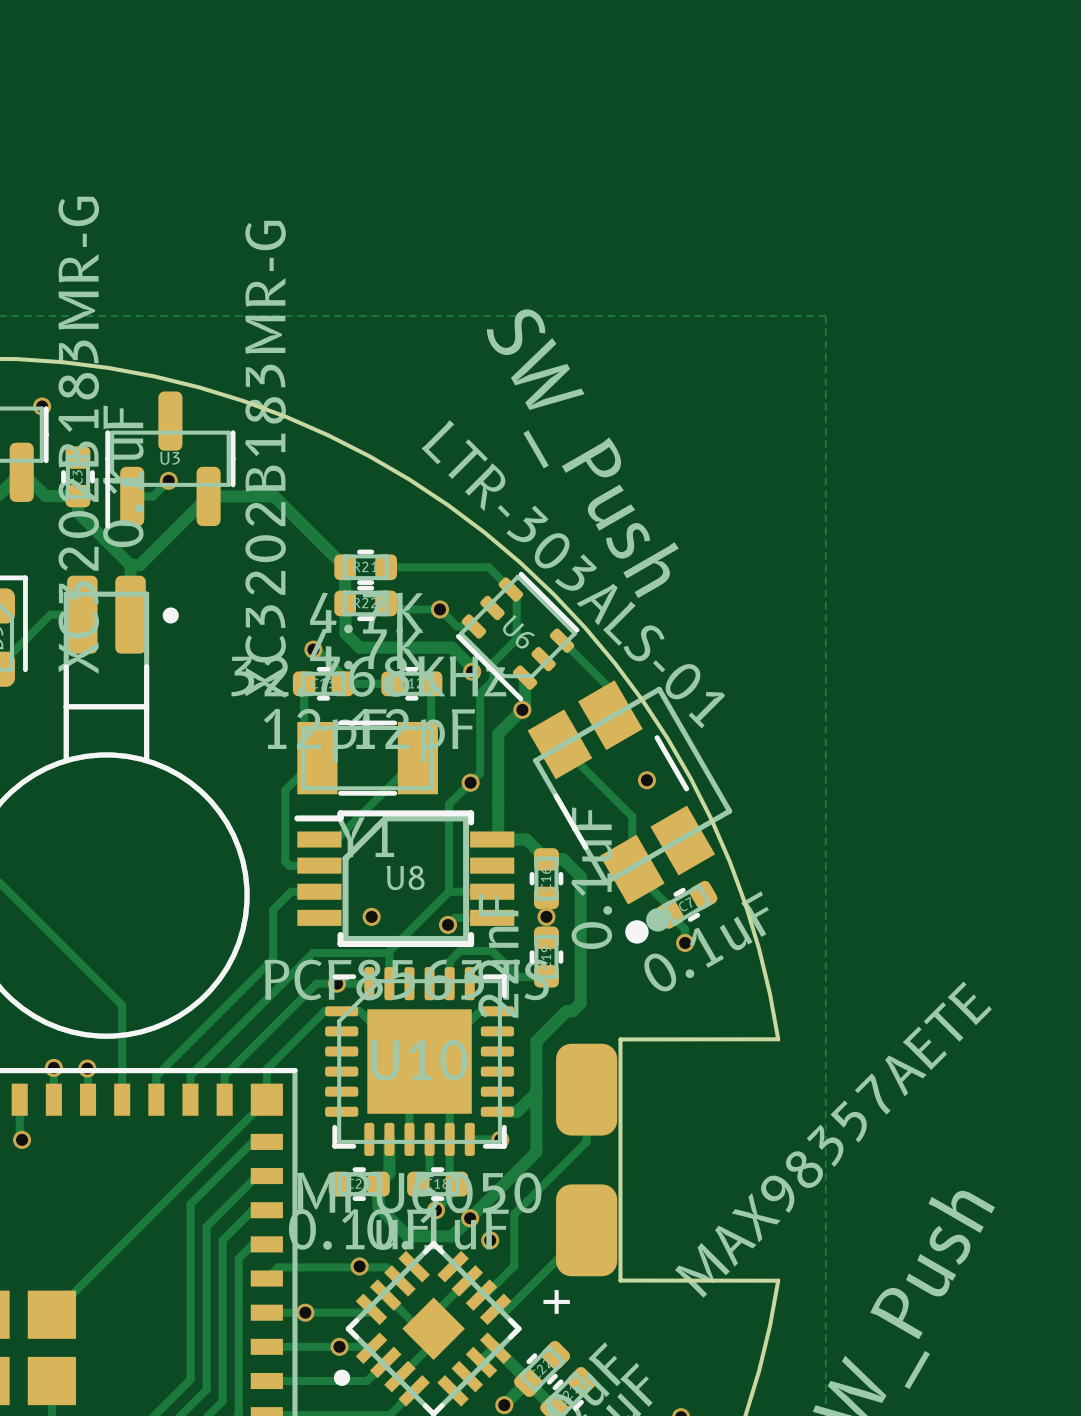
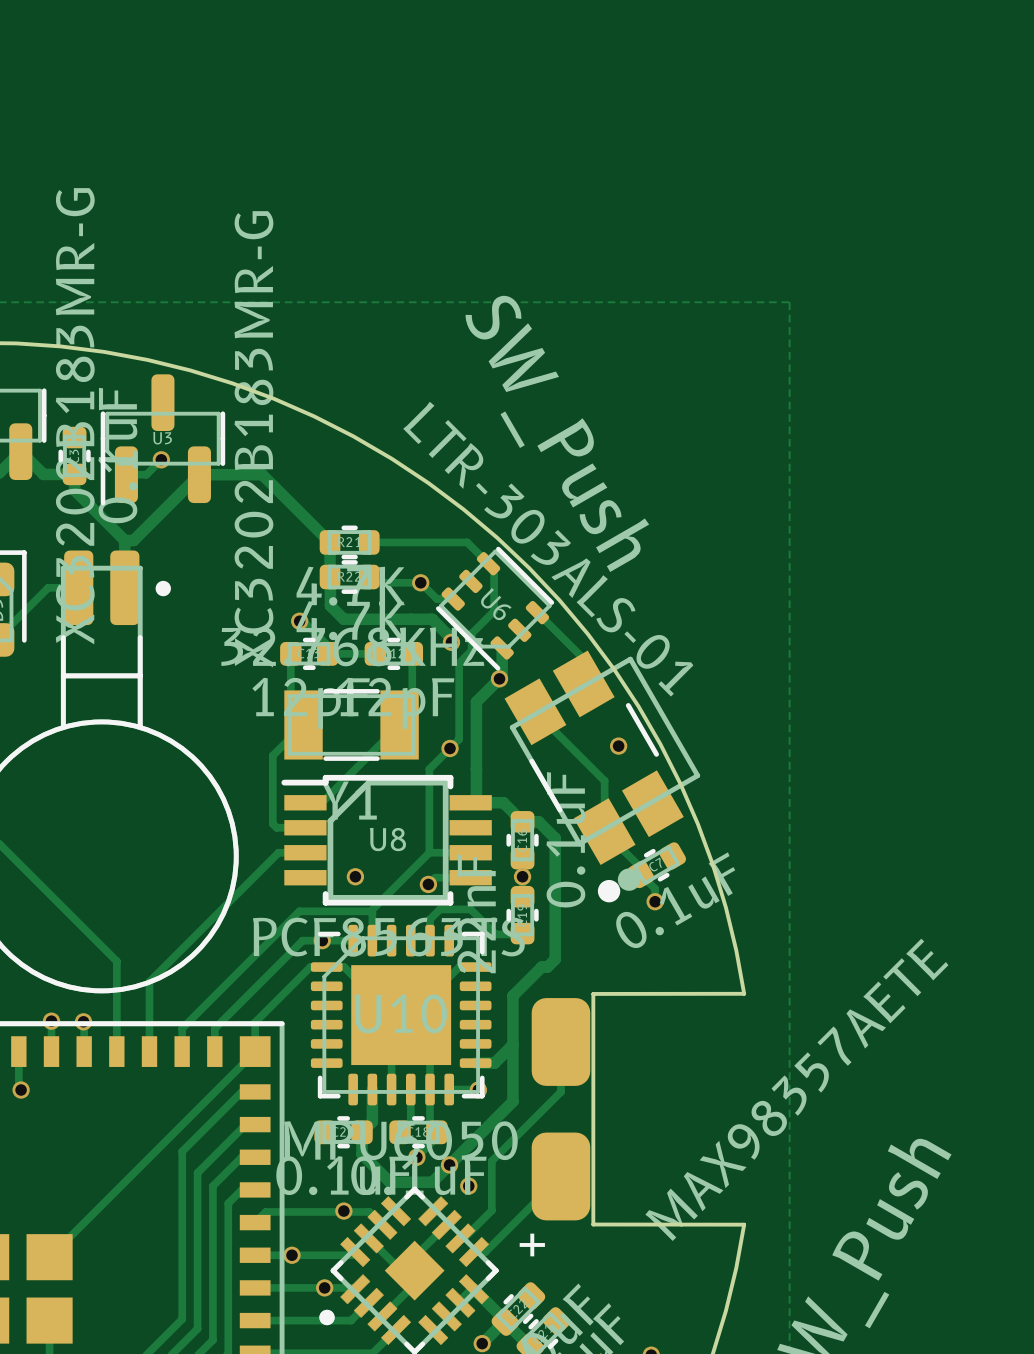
via: (42, 406) -> none
track: (273, 909) (273, 959) (156, 1075) -> (261, 870) (149, 981) (149, 1028)

